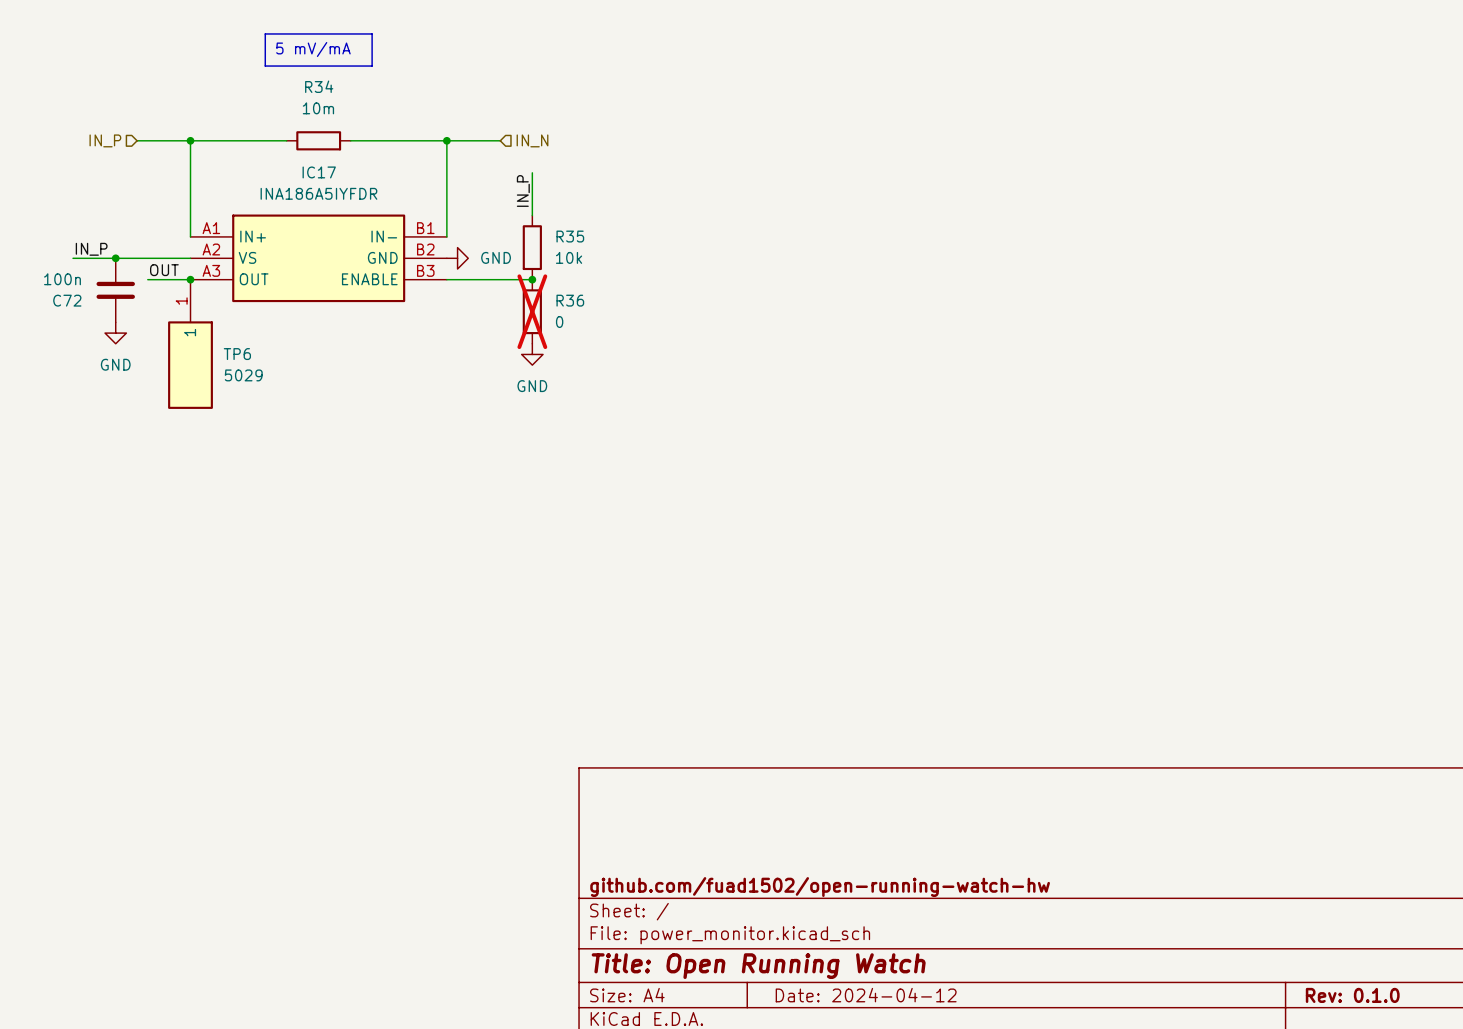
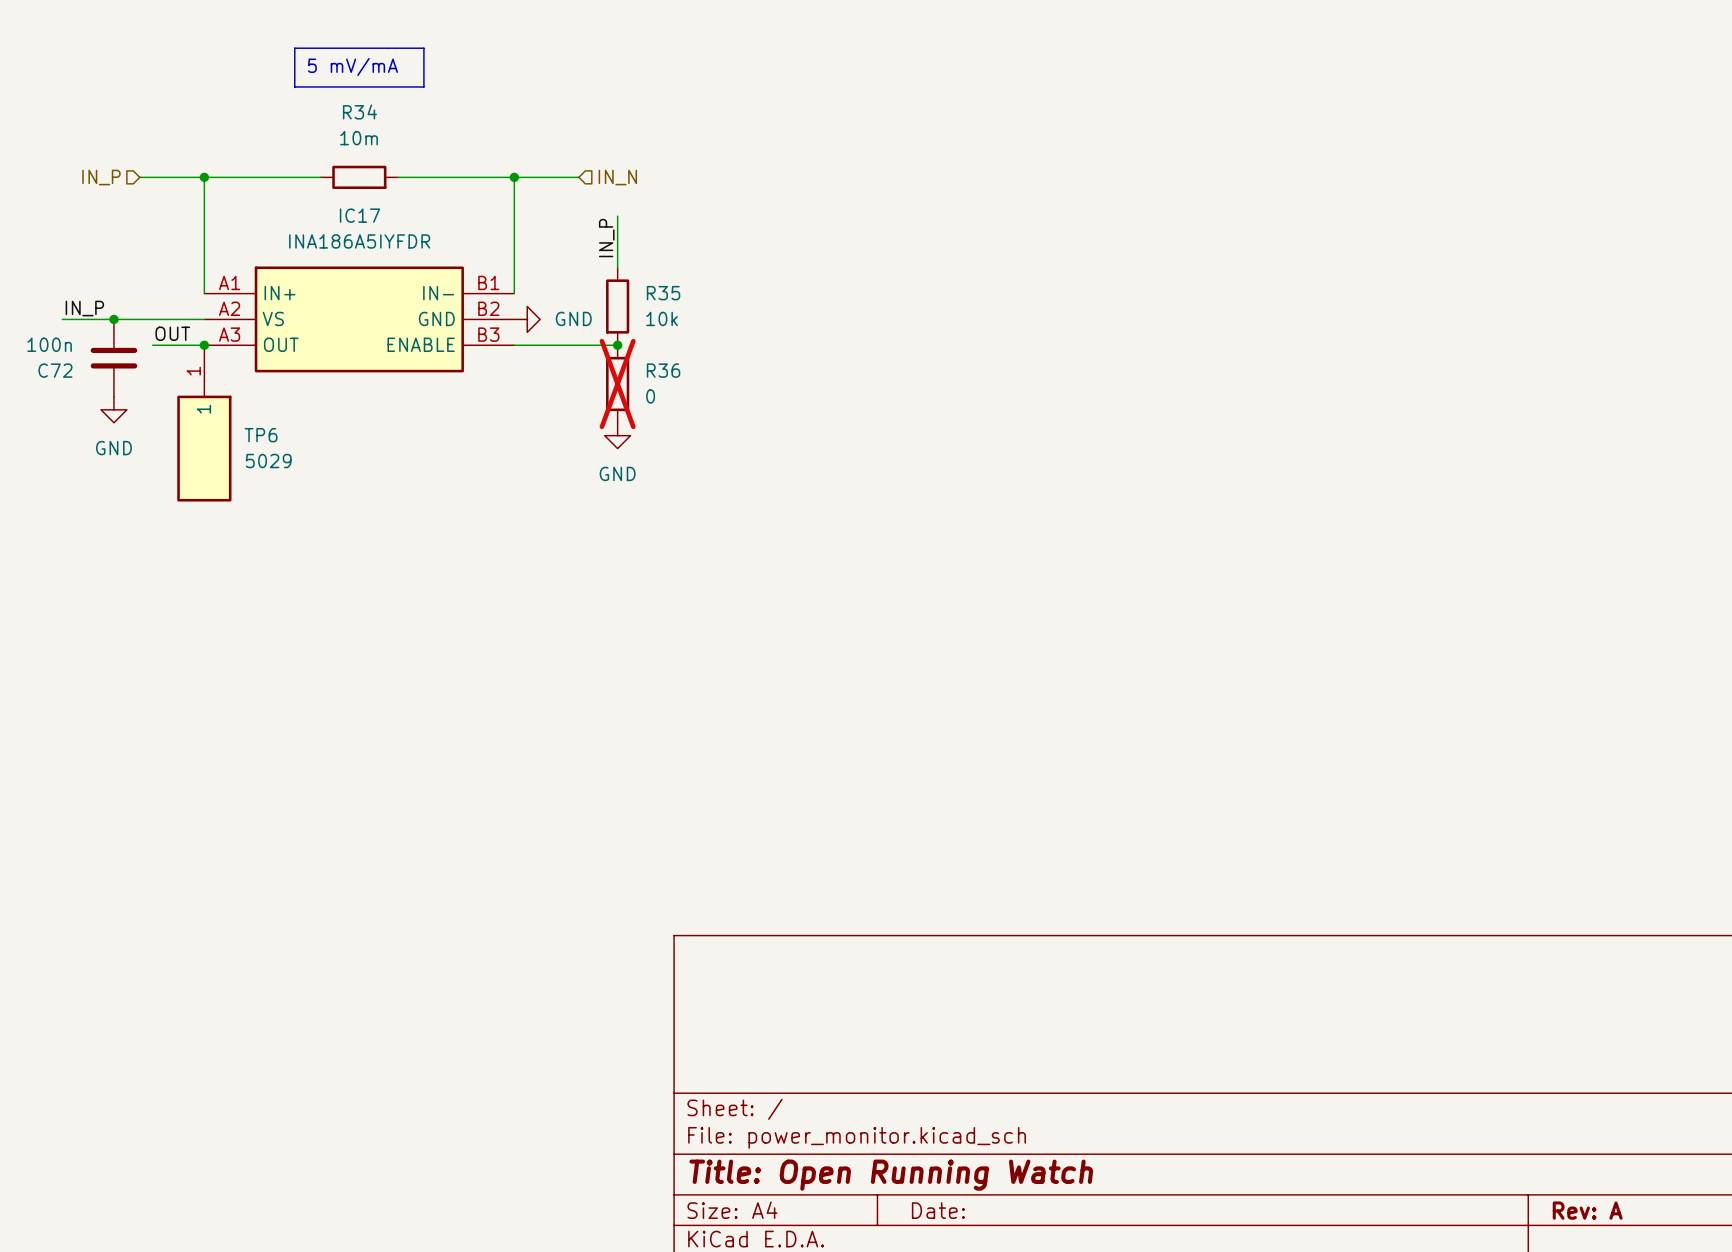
title block: github.com/fuad1502/open-running-watch-hw (820, 887) -> none
title block: Date: 2024-04-12 (866, 995) -> Date: (938, 1210)
title block: Rev: 0.1.0 (1352, 995) -> Rev: A (1587, 1210)

